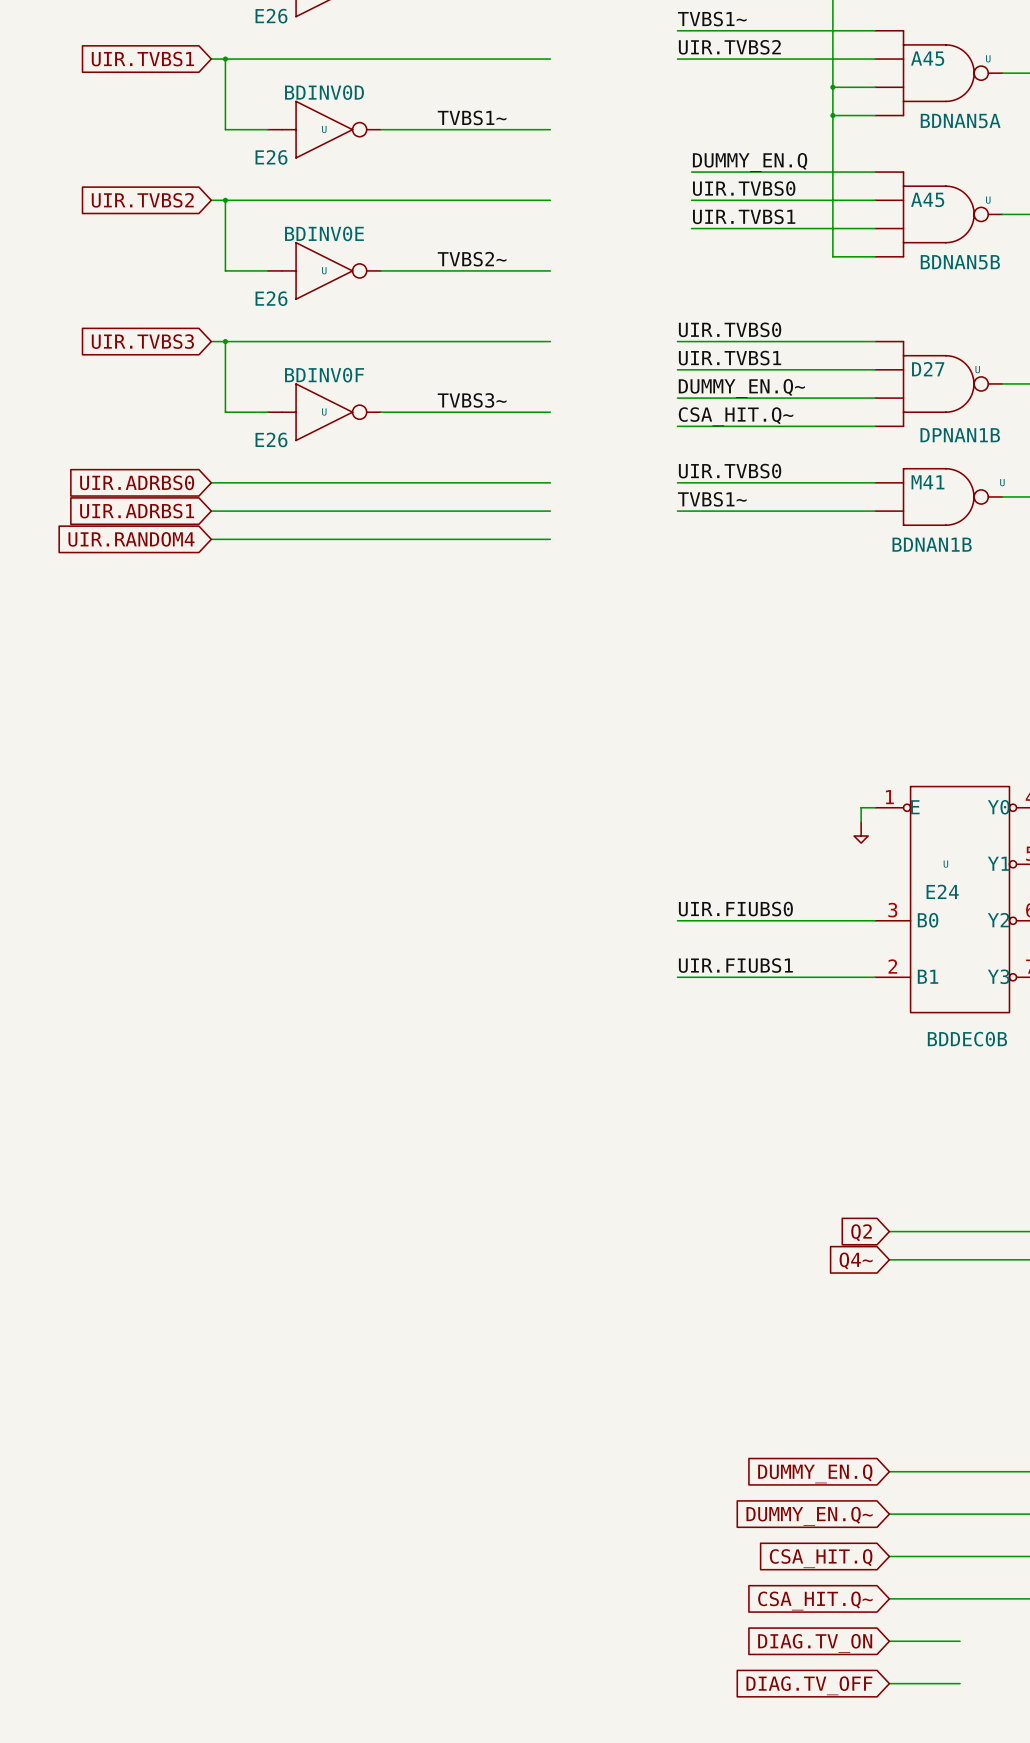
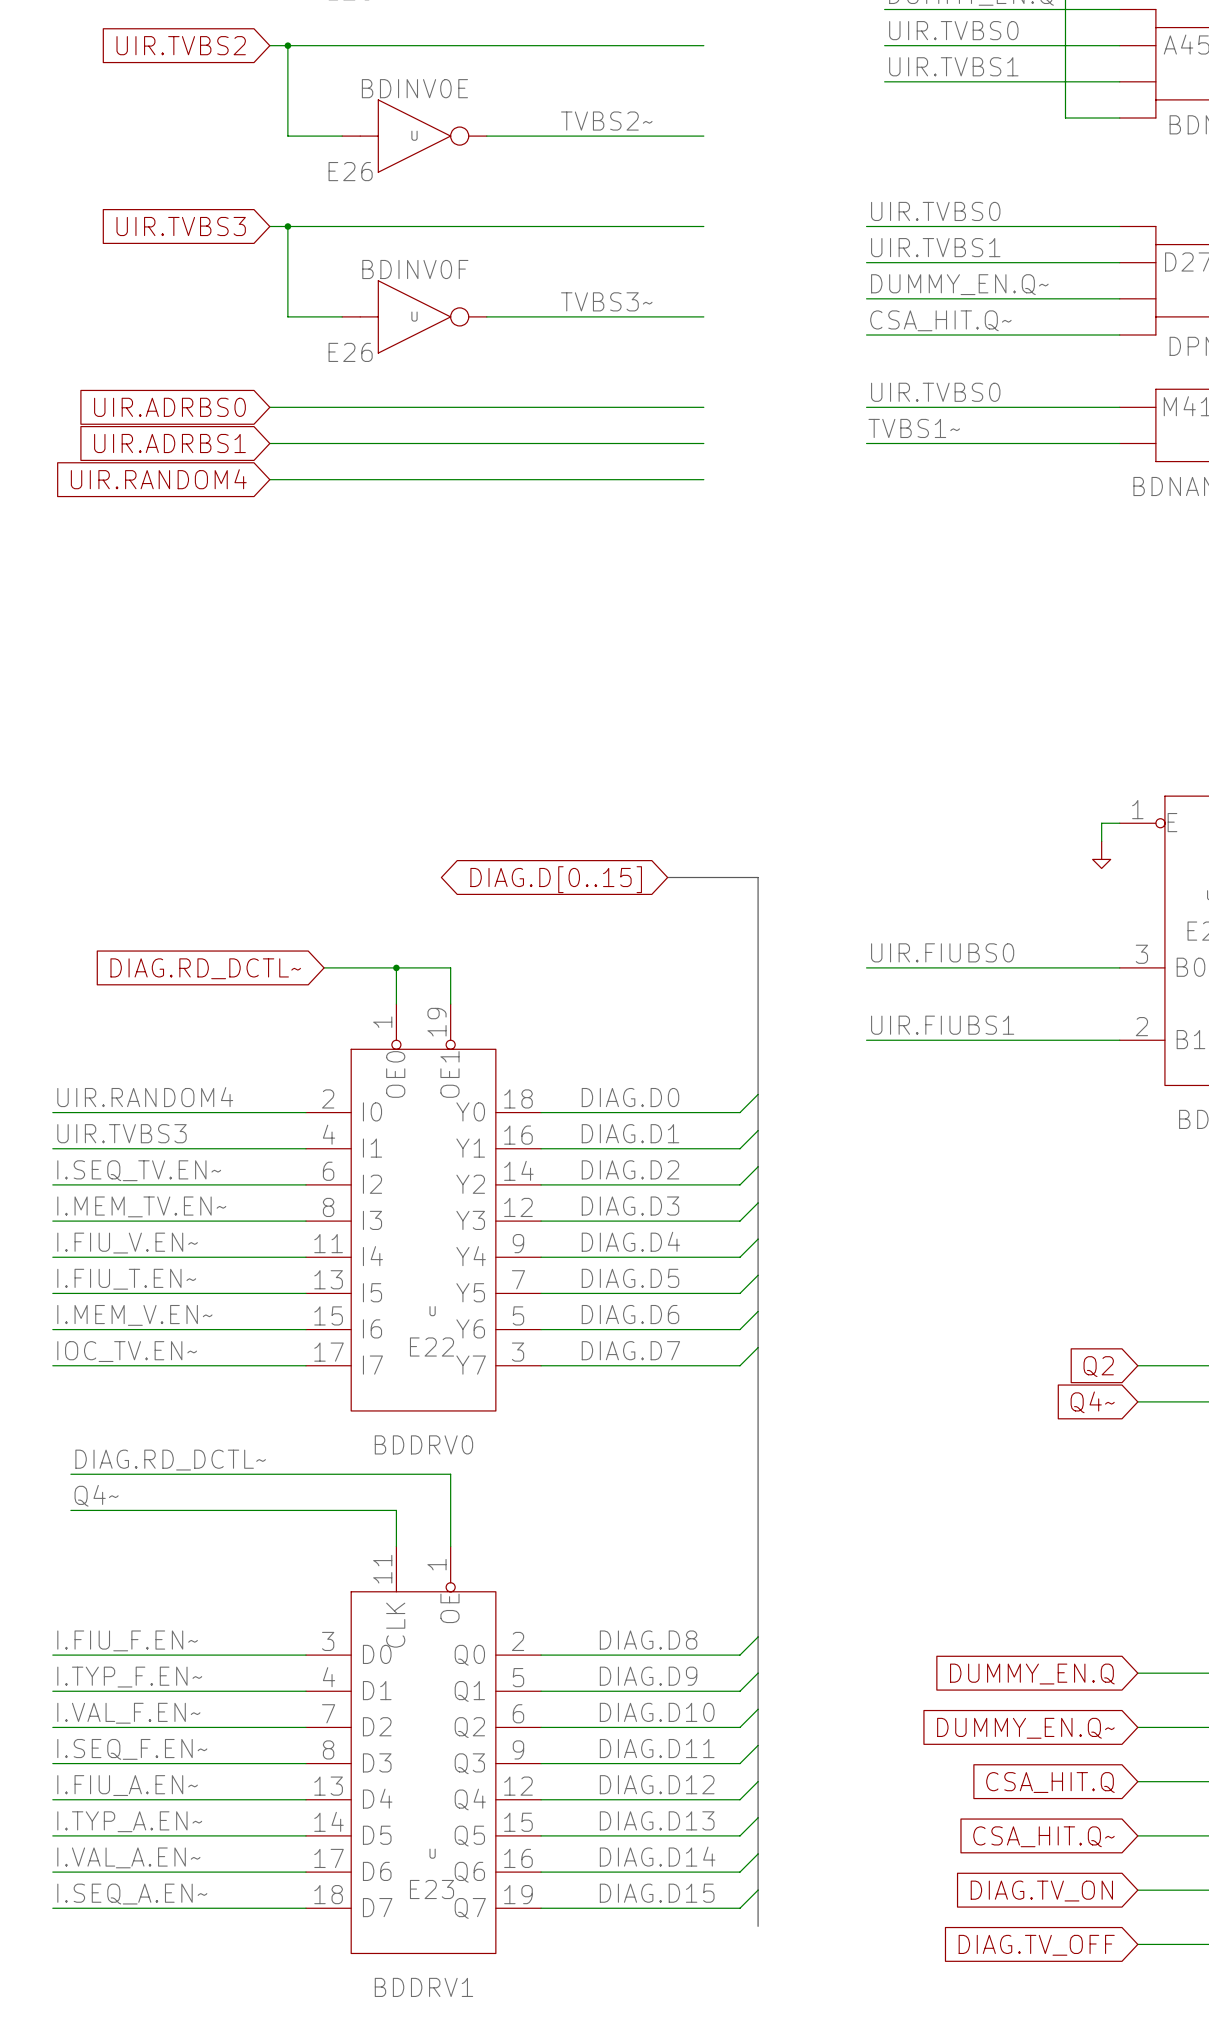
bus: none -> (667, 877) (758, 877) (758, 1926)
global label: none -> DIAG.D[0..15] (556, 879)
wire: none -> (324, 967) (450, 967) (450, 1004)
wire: none -> (396, 967) (396, 1004)
junction: none -> (396, 967)
global label: none -> DIAG.RD_DCTL~ (205, 968)
wire: none -> (758, 1094) (739, 1112) (541, 1112)
label: none -> UIR.RANDOM4 (145, 1097)
label: none -> DIAG.D0 (630, 1097)
wire: none -> (52, 1112) (305, 1112)
wire: none -> (758, 1130) (739, 1148) (541, 1148)
label: none -> UIR.TVBS3 (121, 1133)
label: none -> DIAG.D1 (630, 1133)
wire: none -> (52, 1148) (305, 1148)
wire: none -> (758, 1166) (739, 1184) (541, 1184)
label: none -> DIAG.D2 (630, 1169)
label: none -> I.SEQ_TV.EN~ (139, 1170)
wire: none -> (52, 1184) (305, 1184)
wire: none -> (758, 1203) (739, 1221) (541, 1221)
label: none -> DIAG.D3 (630, 1206)
U: none -> (423, 1207)
label: none -> I.MEM_TV.EN~ (141, 1206)
wire: none -> (52, 1221) (305, 1221)
wire: none -> (758, 1239) (739, 1257) (541, 1257)
label: none -> DIAG.D4 (630, 1241)
label: none -> I.FIU_V.EN~ (127, 1243)
wire: none -> (52, 1257) (305, 1257)
wire: none -> (758, 1275) (739, 1293) (541, 1293)
label: none -> DIAG.D5 (630, 1278)
label: none -> I.FIU_T.EN~ (126, 1279)
wire: none -> (52, 1293) (305, 1293)
wire: none -> (758, 1311) (739, 1329) (541, 1329)
label: none -> DIAG.D6 (630, 1314)
label: none -> I.MEM_V.EN~ (134, 1315)
wire: none -> (52, 1329) (305, 1329)
wire: none -> (758, 1347) (739, 1365) (541, 1365)
label: none -> DIAG.D7 (630, 1350)
label: none -> IOC_TV.EN~ (127, 1351)
wire: none -> (52, 1365) (305, 1365)
label: none -> DIAG.RD_DCTL~ (170, 1460)
wire: none -> (70, 1474) (450, 1474) (450, 1546)
label: none -> Q4~ (96, 1495)
wire: none -> (70, 1510) (396, 1510) (396, 1546)
wire: none -> (758, 1637) (739, 1655) (541, 1655)
label: none -> DIAG.D8 (648, 1640)
label: none -> I.FIU_F.EN~ (127, 1640)
wire: none -> (52, 1655) (305, 1655)
wire: none -> (758, 1673) (739, 1691) (541, 1691)
label: none -> DIAG.D9 (648, 1676)
label: none -> I.TYP_F.EN~ (129, 1677)
wire: none -> (52, 1691) (305, 1691)
wire: none -> (758, 1709) (739, 1727) (541, 1727)
label: none -> DIAG.D10 (657, 1712)
label: none -> I.VAL_F.EN~ (128, 1713)
wire: none -> (52, 1727) (305, 1727)
wire: none -> (758, 1745) (739, 1763) (541, 1763)
label: none -> DIAG.D11 (657, 1748)
U: none -> (423, 1750)
label: none -> I.SEQ_F.EN~ (132, 1749)
wire: none -> (52, 1763) (305, 1763)
wire: none -> (758, 1781) (739, 1799) (541, 1799)
label: none -> DIAG.D12 (657, 1784)
label: none -> I.FIU_A.EN~ (127, 1785)
wire: none -> (52, 1799) (305, 1799)
wire: none -> (758, 1817) (739, 1835) (541, 1835)
label: none -> DIAG.D13 (657, 1820)
label: none -> I.TYP_A.EN~ (129, 1821)
wire: none -> (52, 1835) (305, 1835)
wire: none -> (758, 1854) (739, 1872) (541, 1872)
label: none -> DIAG.D14 (657, 1856)
label: none -> I.VAL_A.EN~ (128, 1857)
wire: none -> (52, 1872) (305, 1872)
wire: none -> (758, 1890) (739, 1908) (541, 1908)
label: none -> DIAG.D15 (657, 1893)
label: none -> I.SEQ_A.EN~ (132, 1894)
wire: none -> (52, 1908) (305, 1908)

